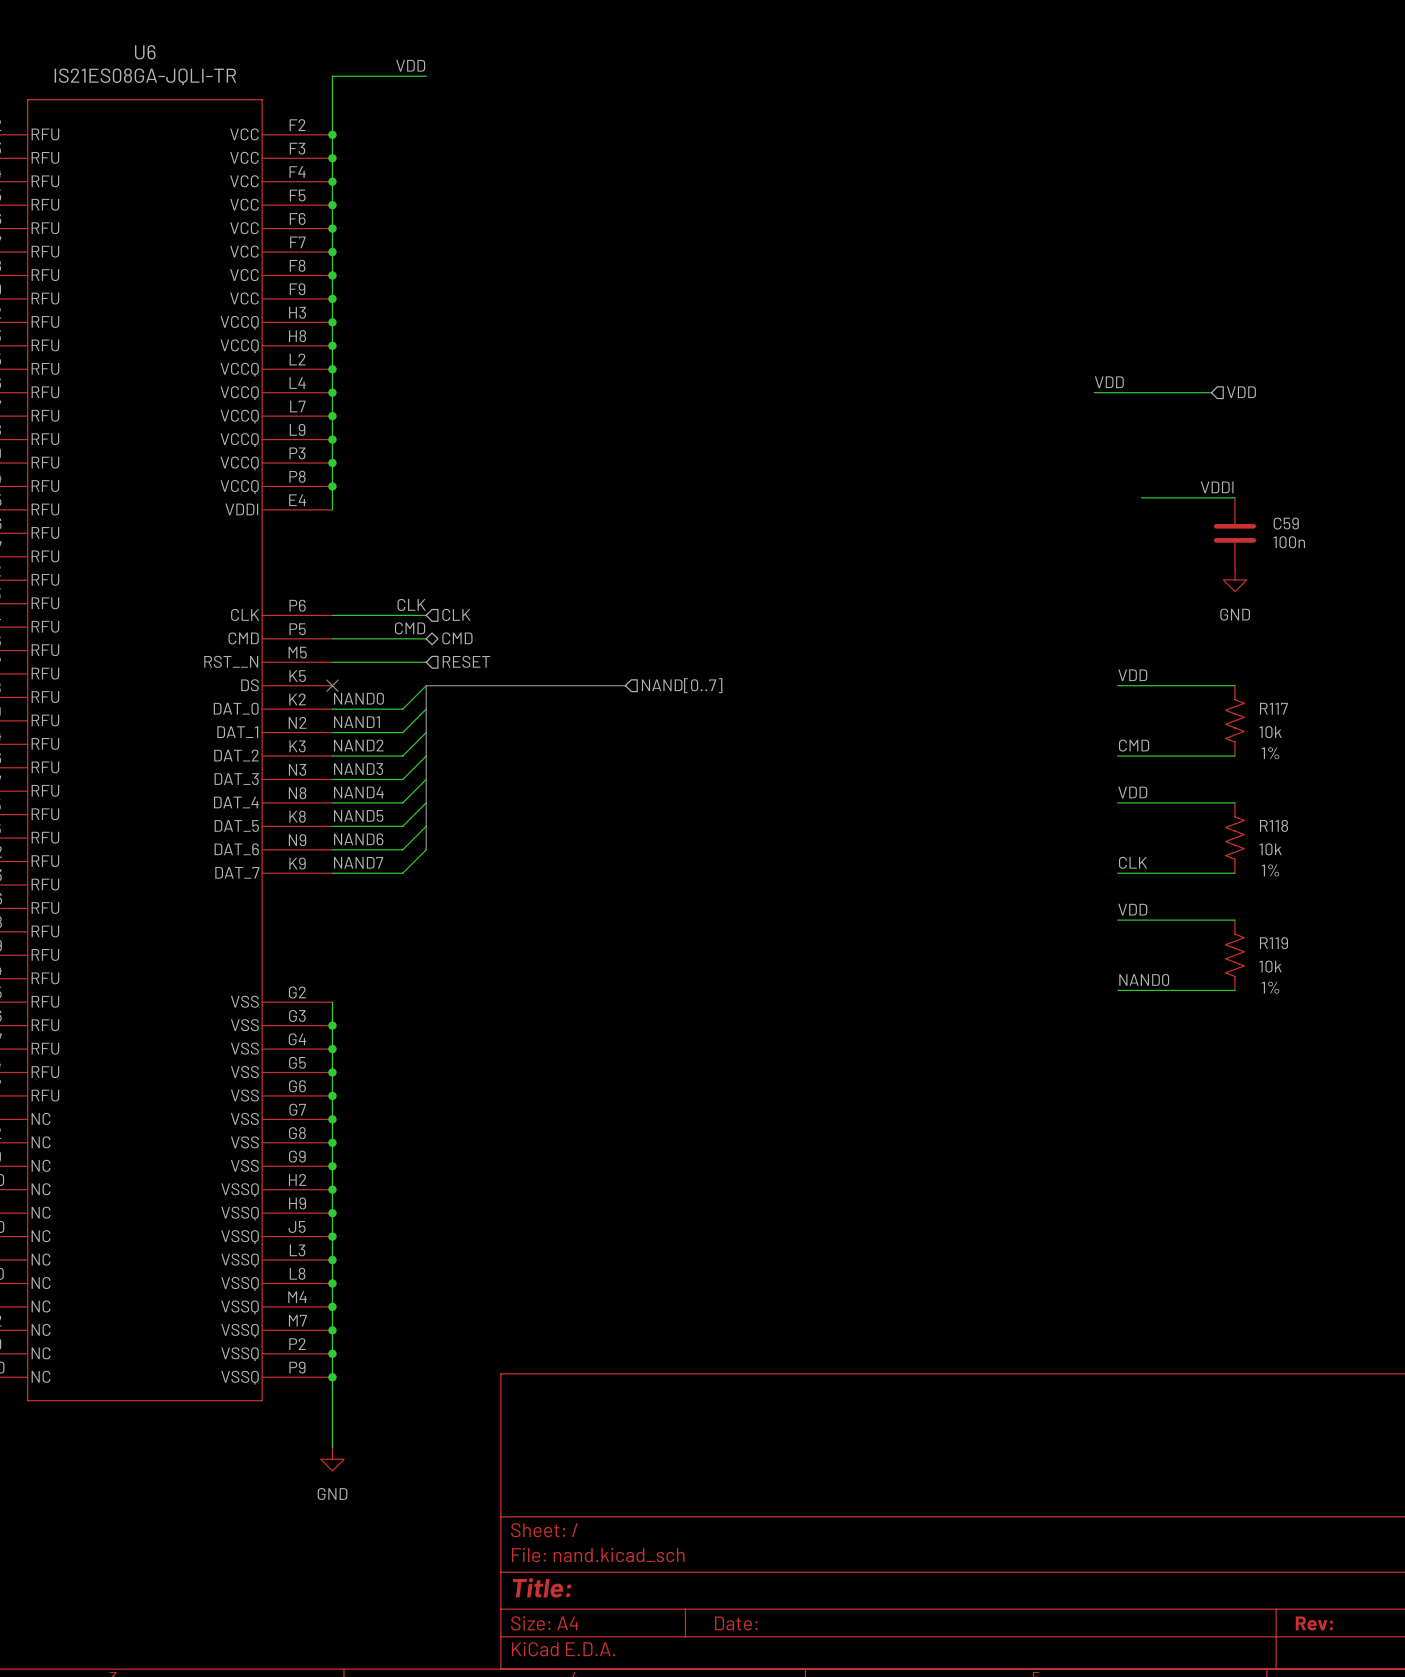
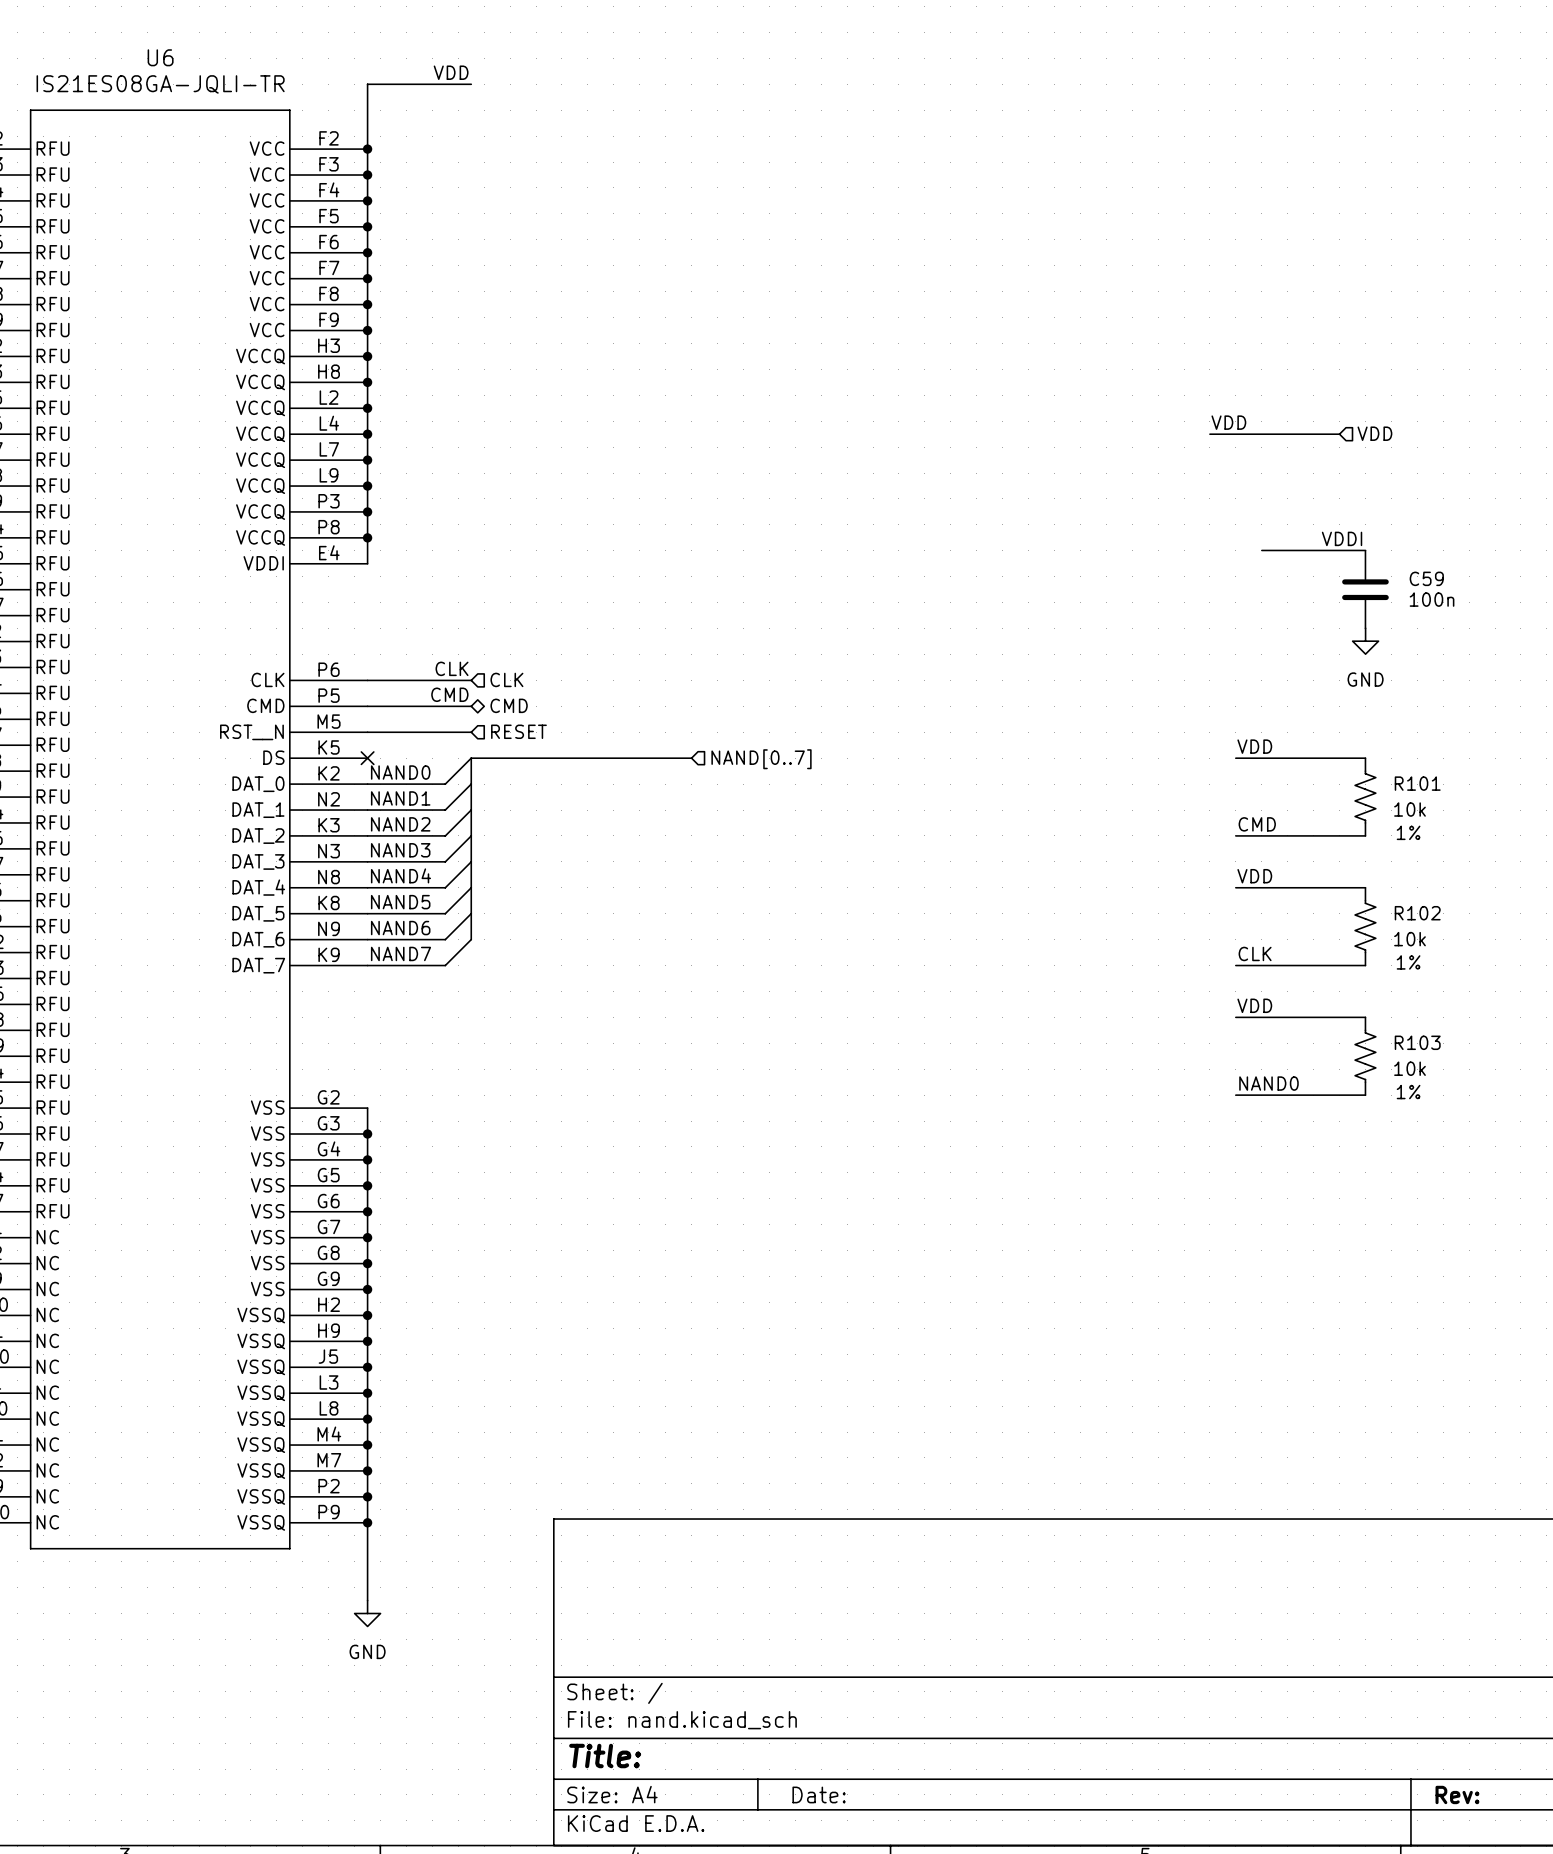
R117 name: R117 (1273, 708) -> R101 (1417, 783)
R118 name: R118 (1274, 825) -> R102 (1417, 913)
R119 name: R119 (1273, 943) -> R103 (1417, 1042)

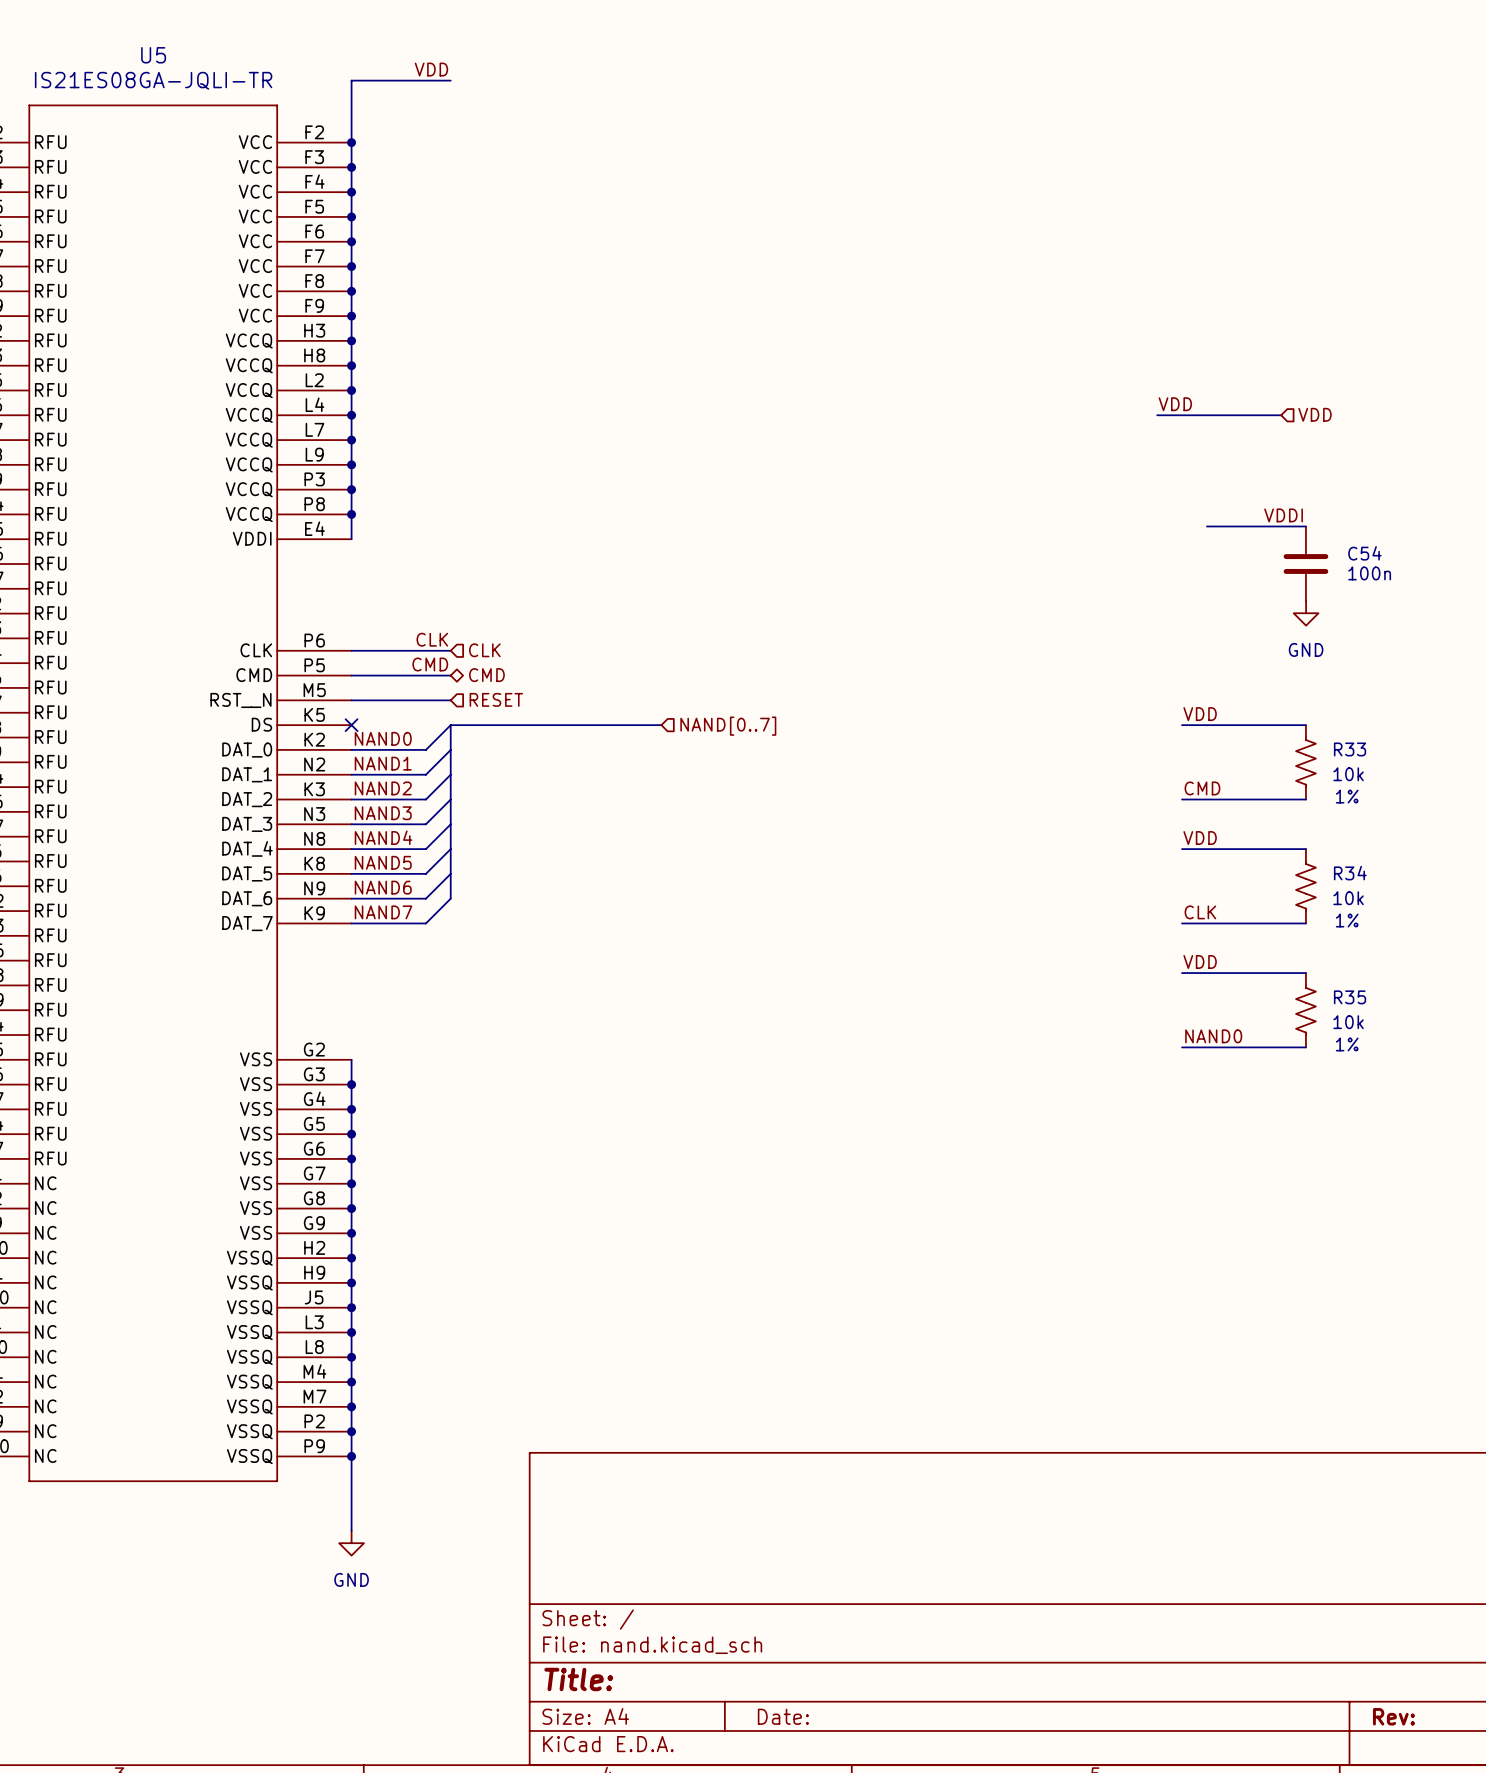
U6 name: U6 (160, 57) -> U5 (153, 55)
C59 name: C59 (1426, 578) -> C54 (1364, 553)
R101 name: R101 (1417, 783) -> R33 (1350, 749)
R102 name: R102 (1417, 913) -> R34 (1350, 873)
R103 name: R103 (1417, 1042) -> R35 (1350, 997)

